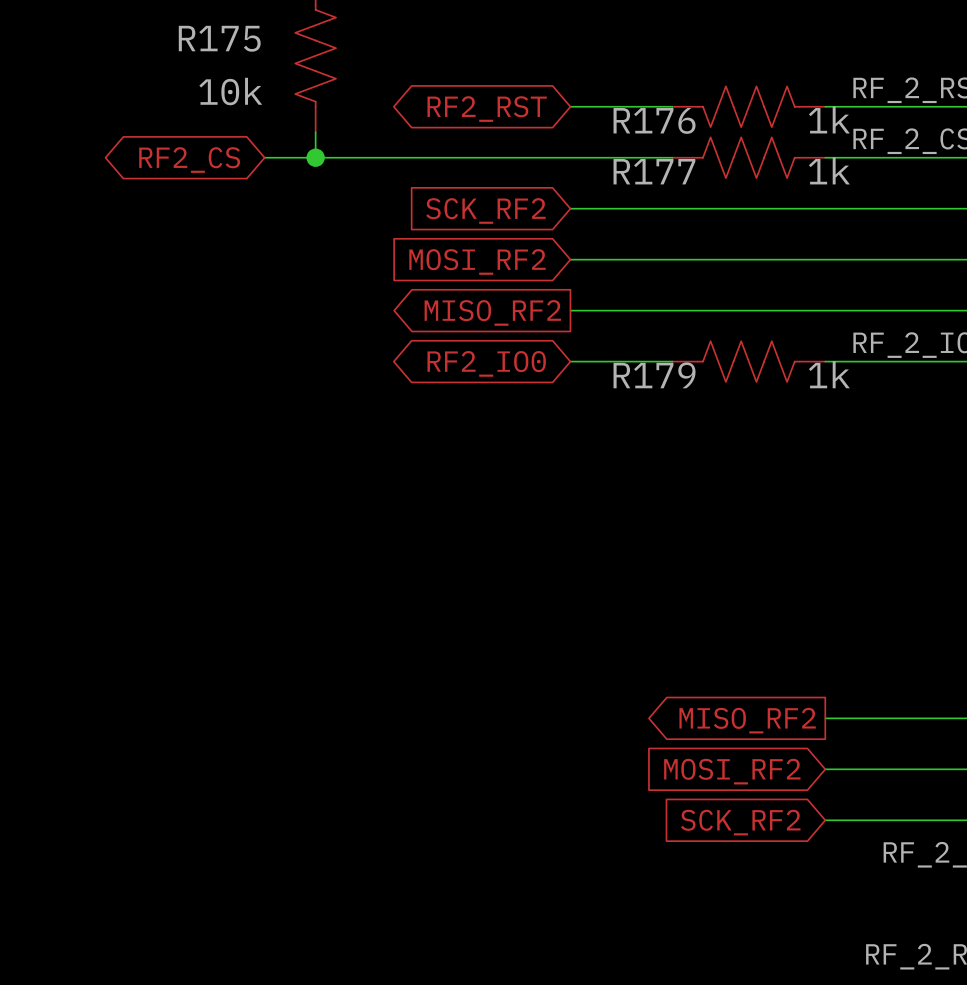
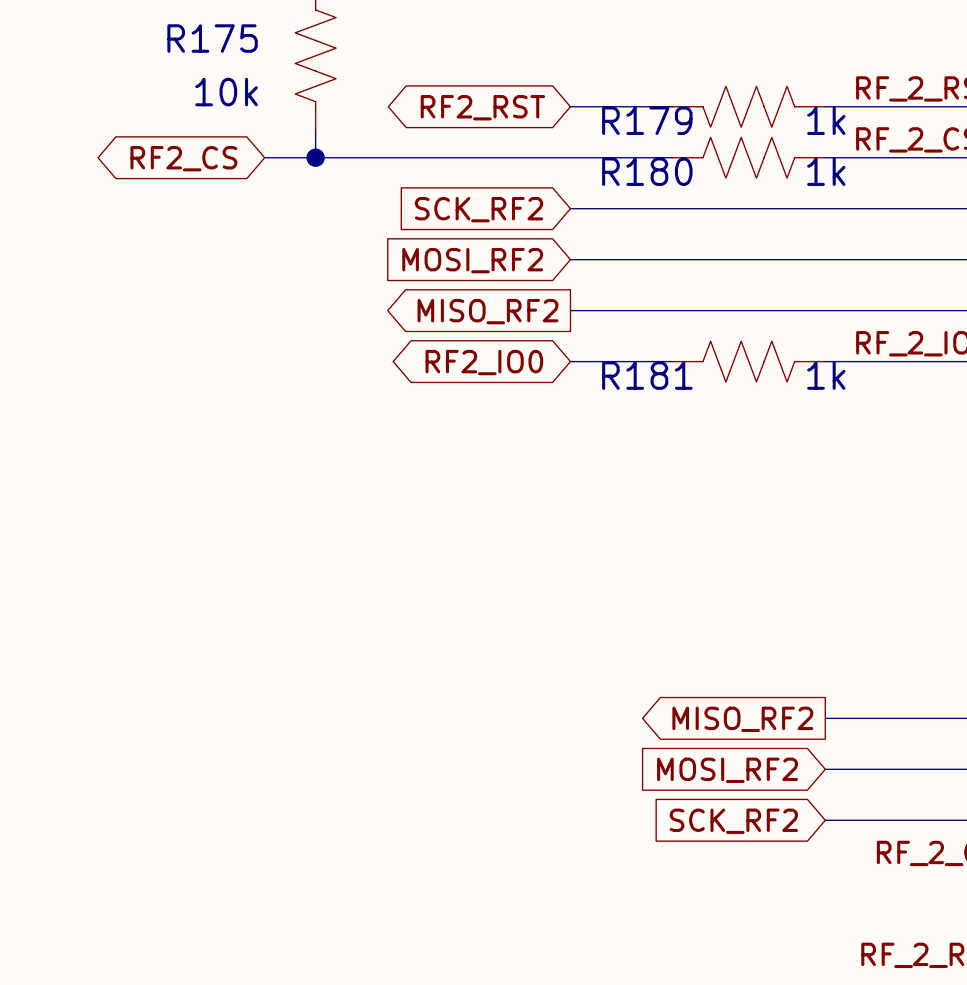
R176 name: R176 (654, 120) -> R179 (647, 120)
R177 name: R177 (654, 171) -> R180 (647, 171)
R179 name: R179 (654, 375) -> R181 (647, 375)

